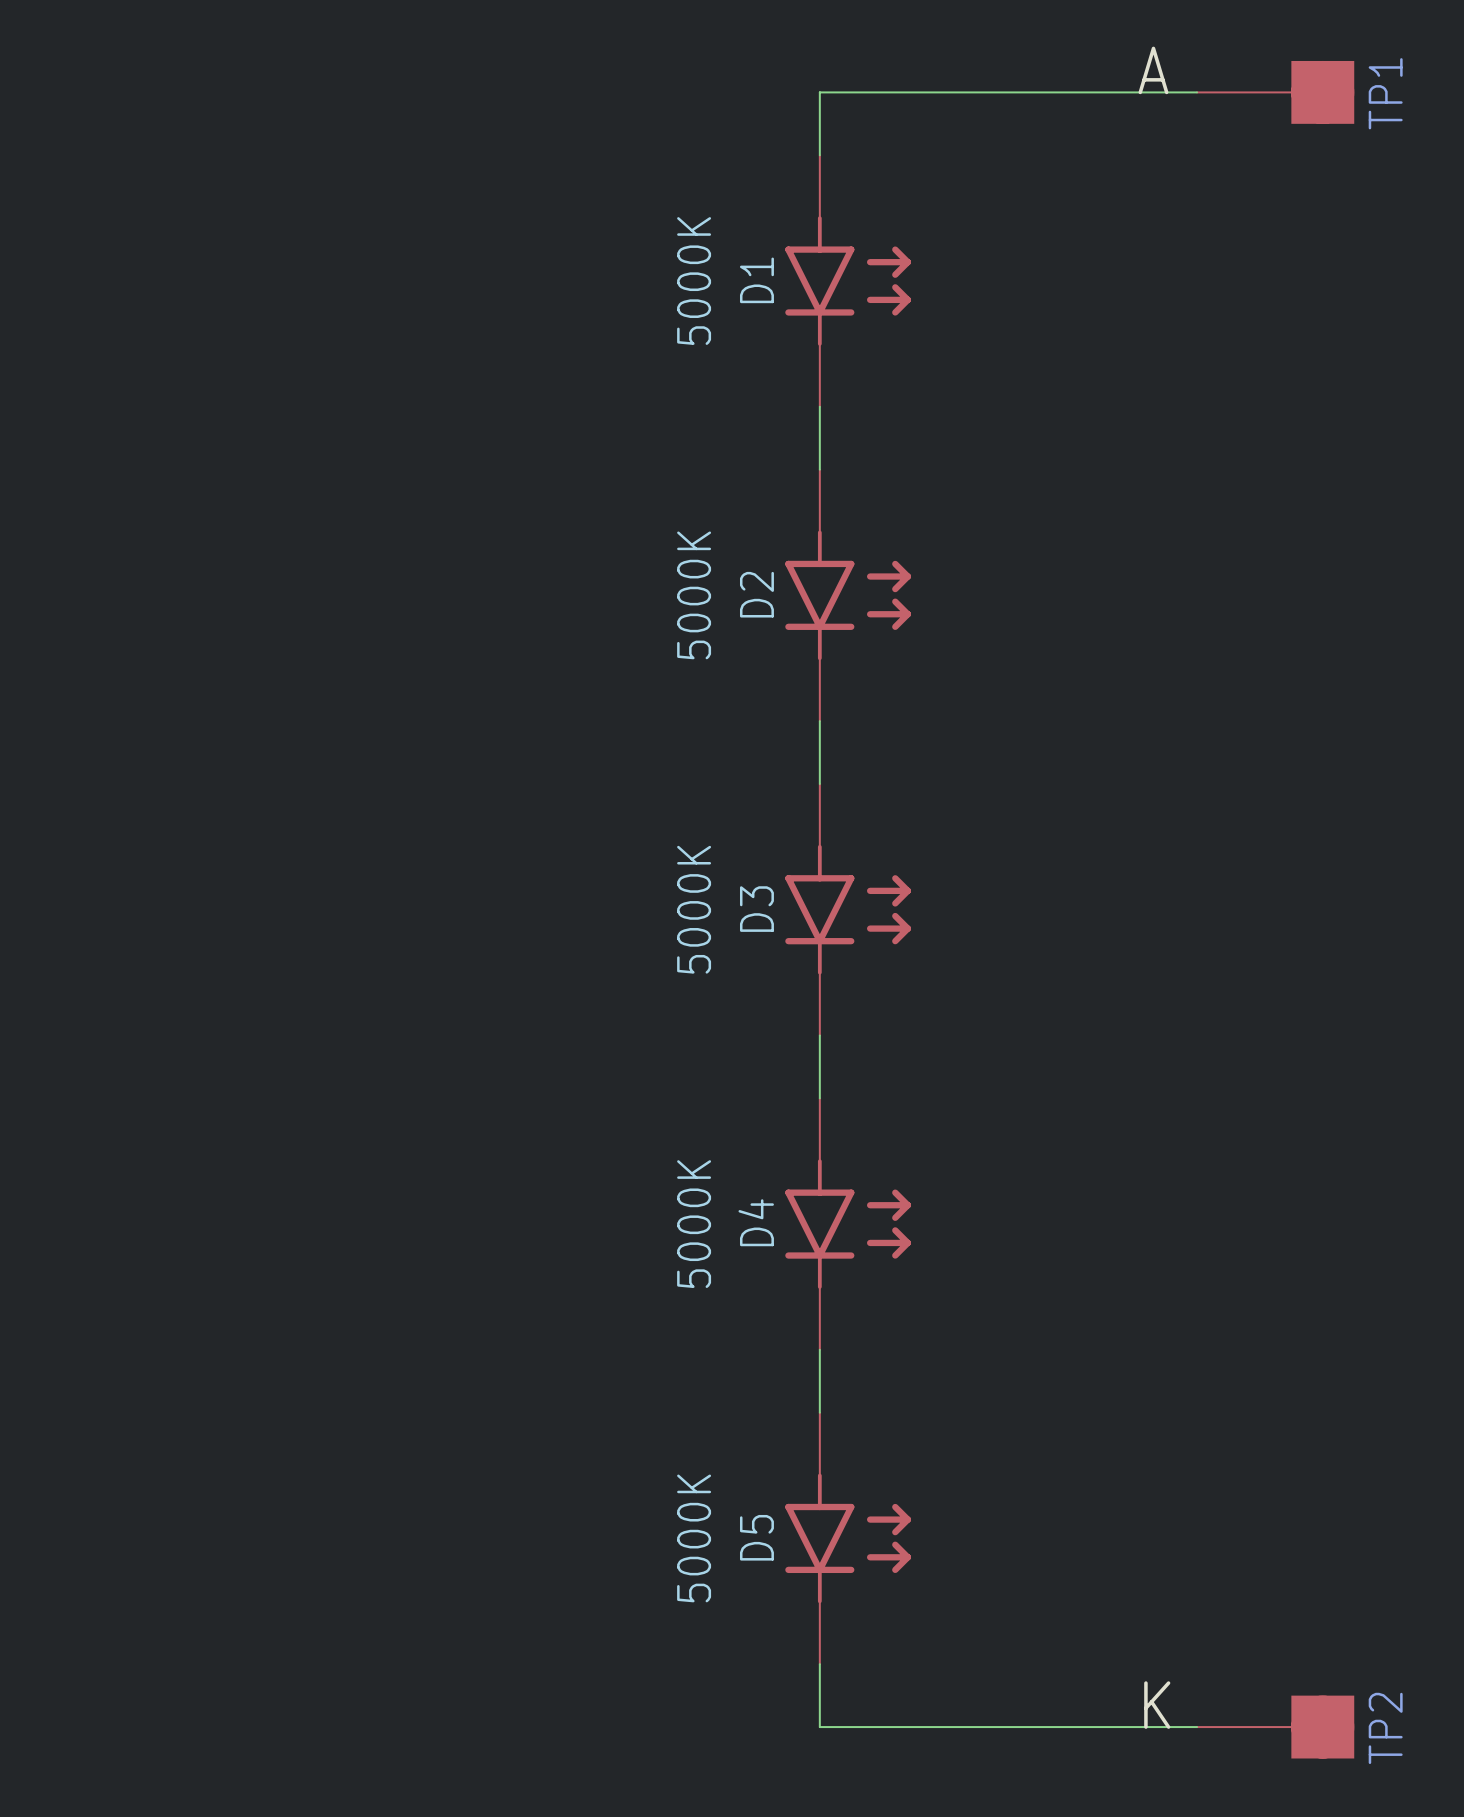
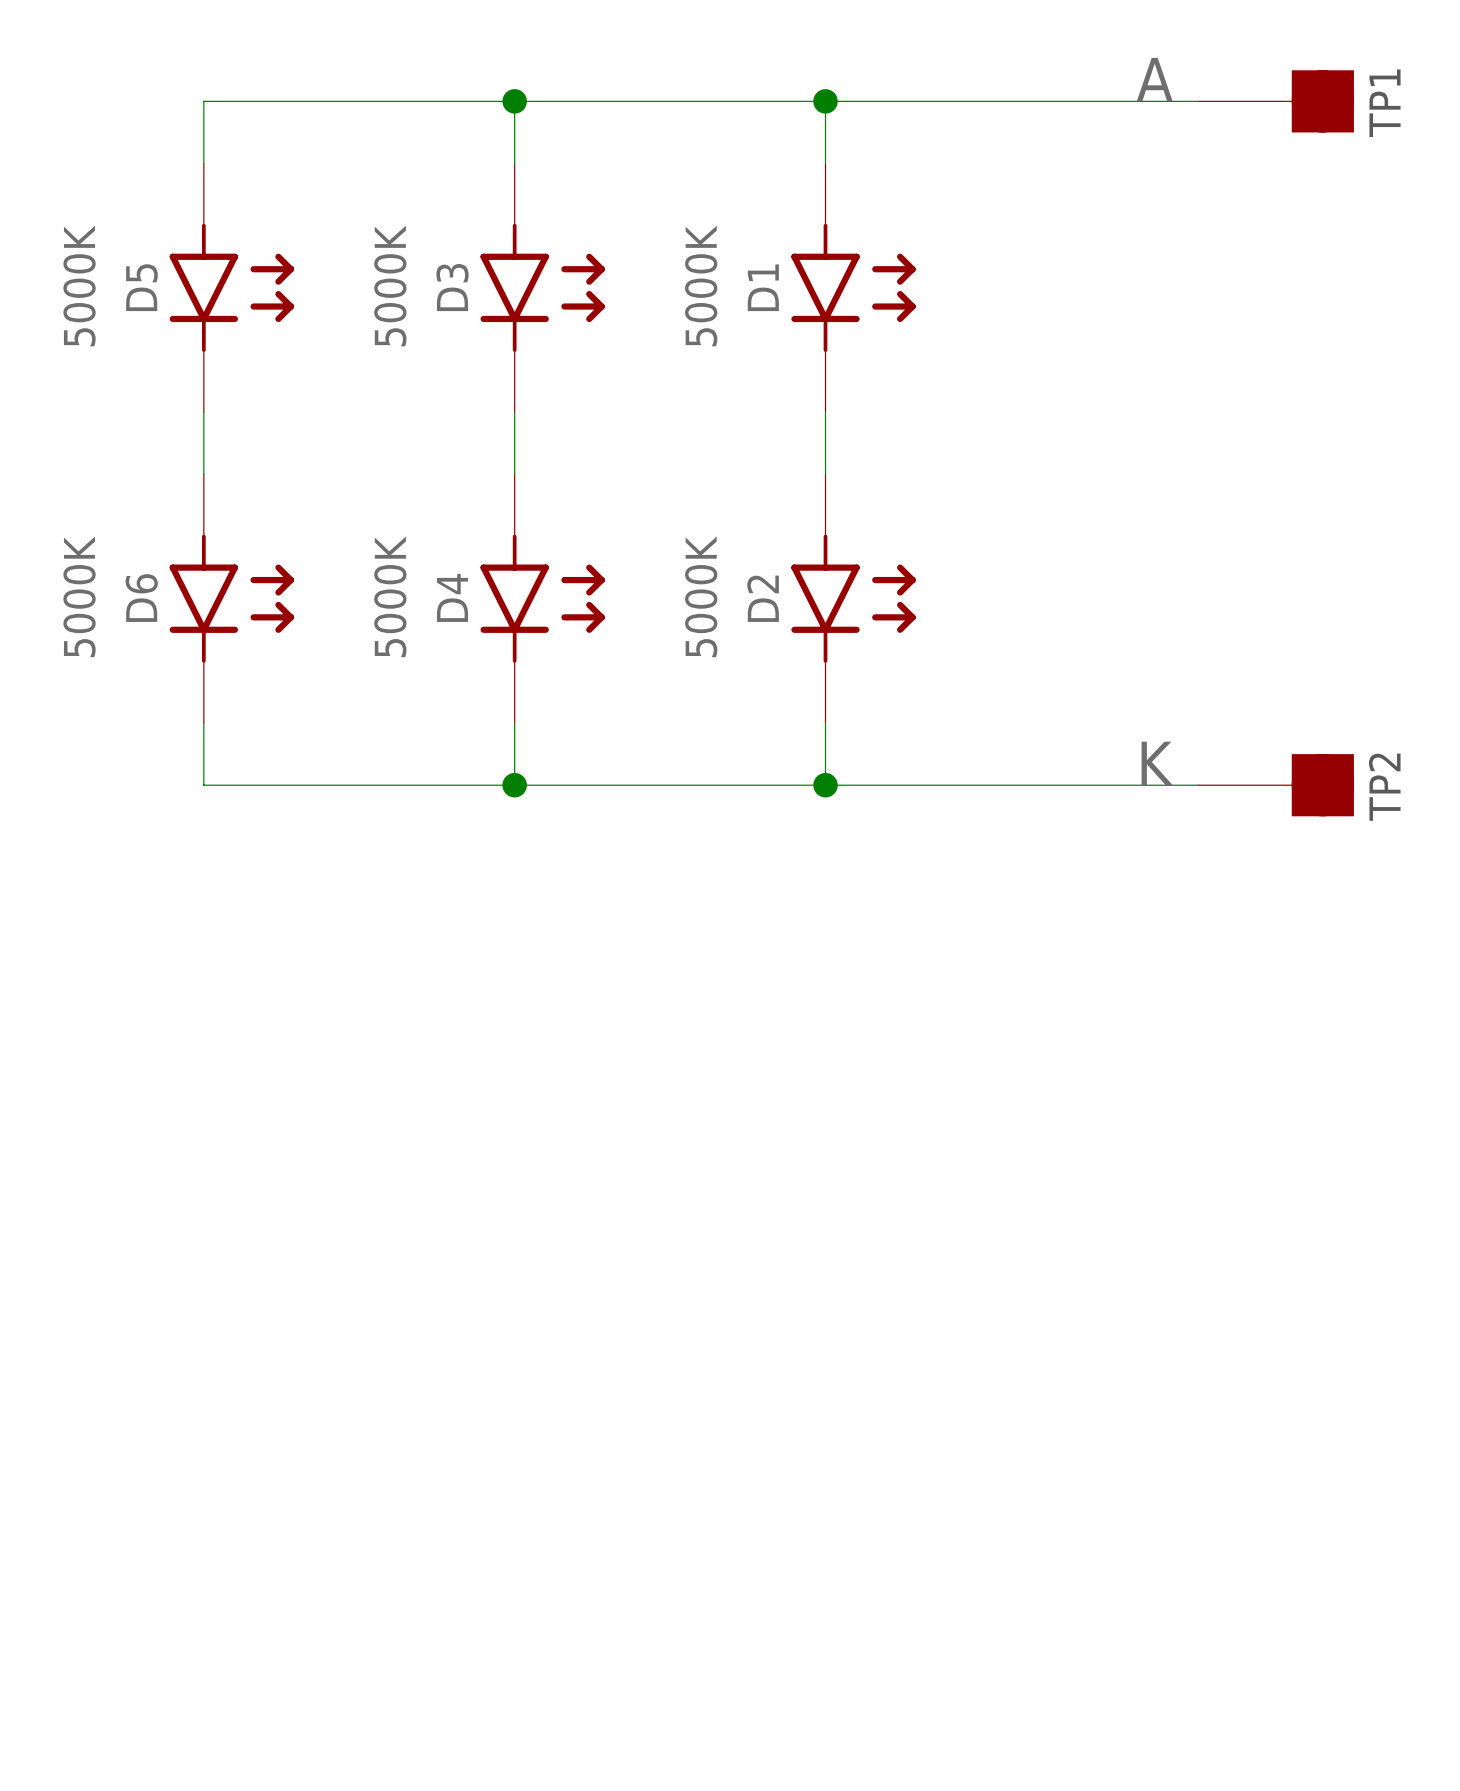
wire: none -> (514, 101) (514, 163)
junction: none -> (514, 101)
wire: none -> (825, 101) (203, 101) (203, 163)
junction: none -> (825, 101)
wire: none -> (203, 412) (203, 474)
wire: none -> (514, 412) (514, 474)
D6: none -> 5000K (231, 598)
wire: none -> (203, 723) (203, 785) (1198, 785)
label: none -> K (1157, 763)
junction: none -> (514, 785)
junction: none -> (825, 785)
D3 position: (848, 909) -> (542, 287)
wire: (819, 1035) (819, 1098) -> (514, 723) (514, 785)
D4 position: (848, 1224) -> (542, 598)
wire: (819, 1349) (819, 1412) -> none
D5 position: (848, 1538) -> (231, 287)
wire: (819, 1664) (819, 1727) (1197, 1727) -> none
label: K (1157, 1705) -> none
TP2 position: (1275, 1727) -> (1276, 785)

